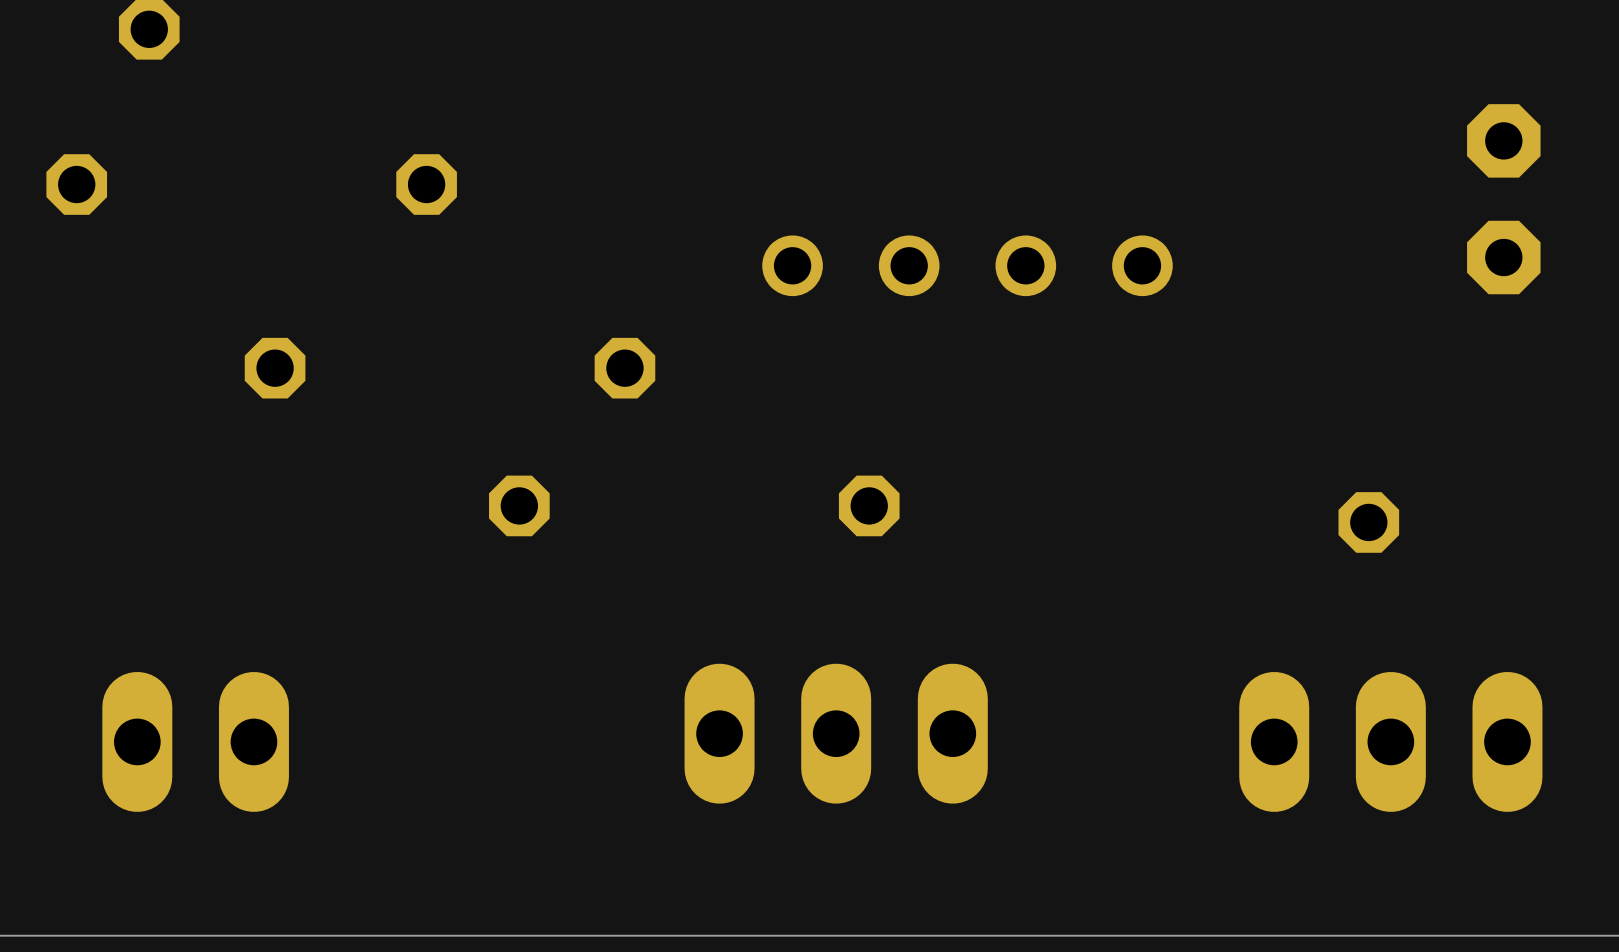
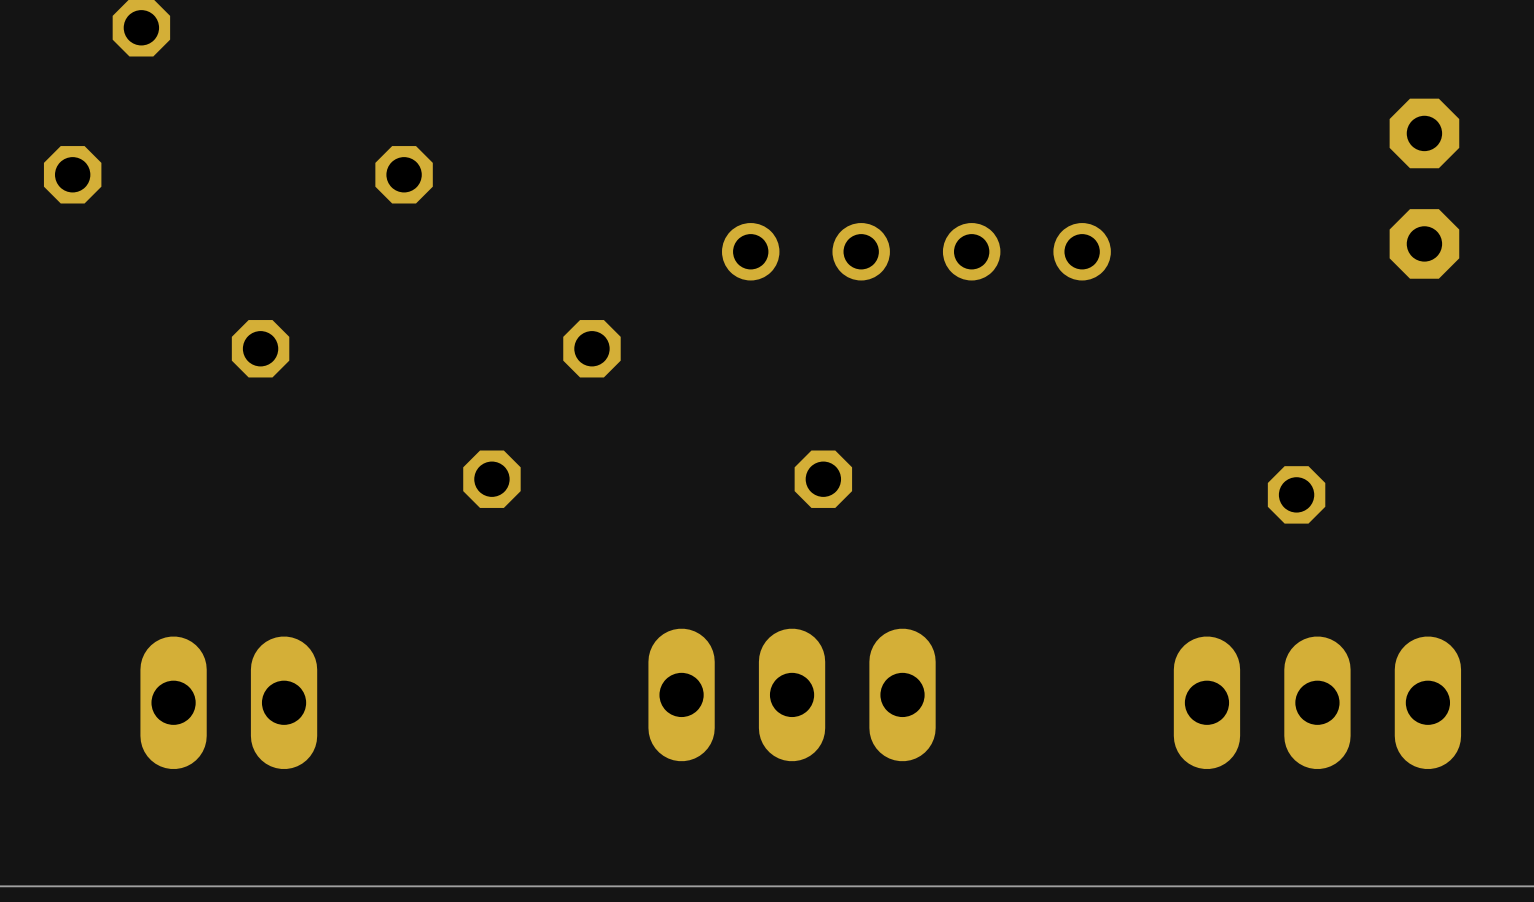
part position: (195, 741) -> (228, 702)

